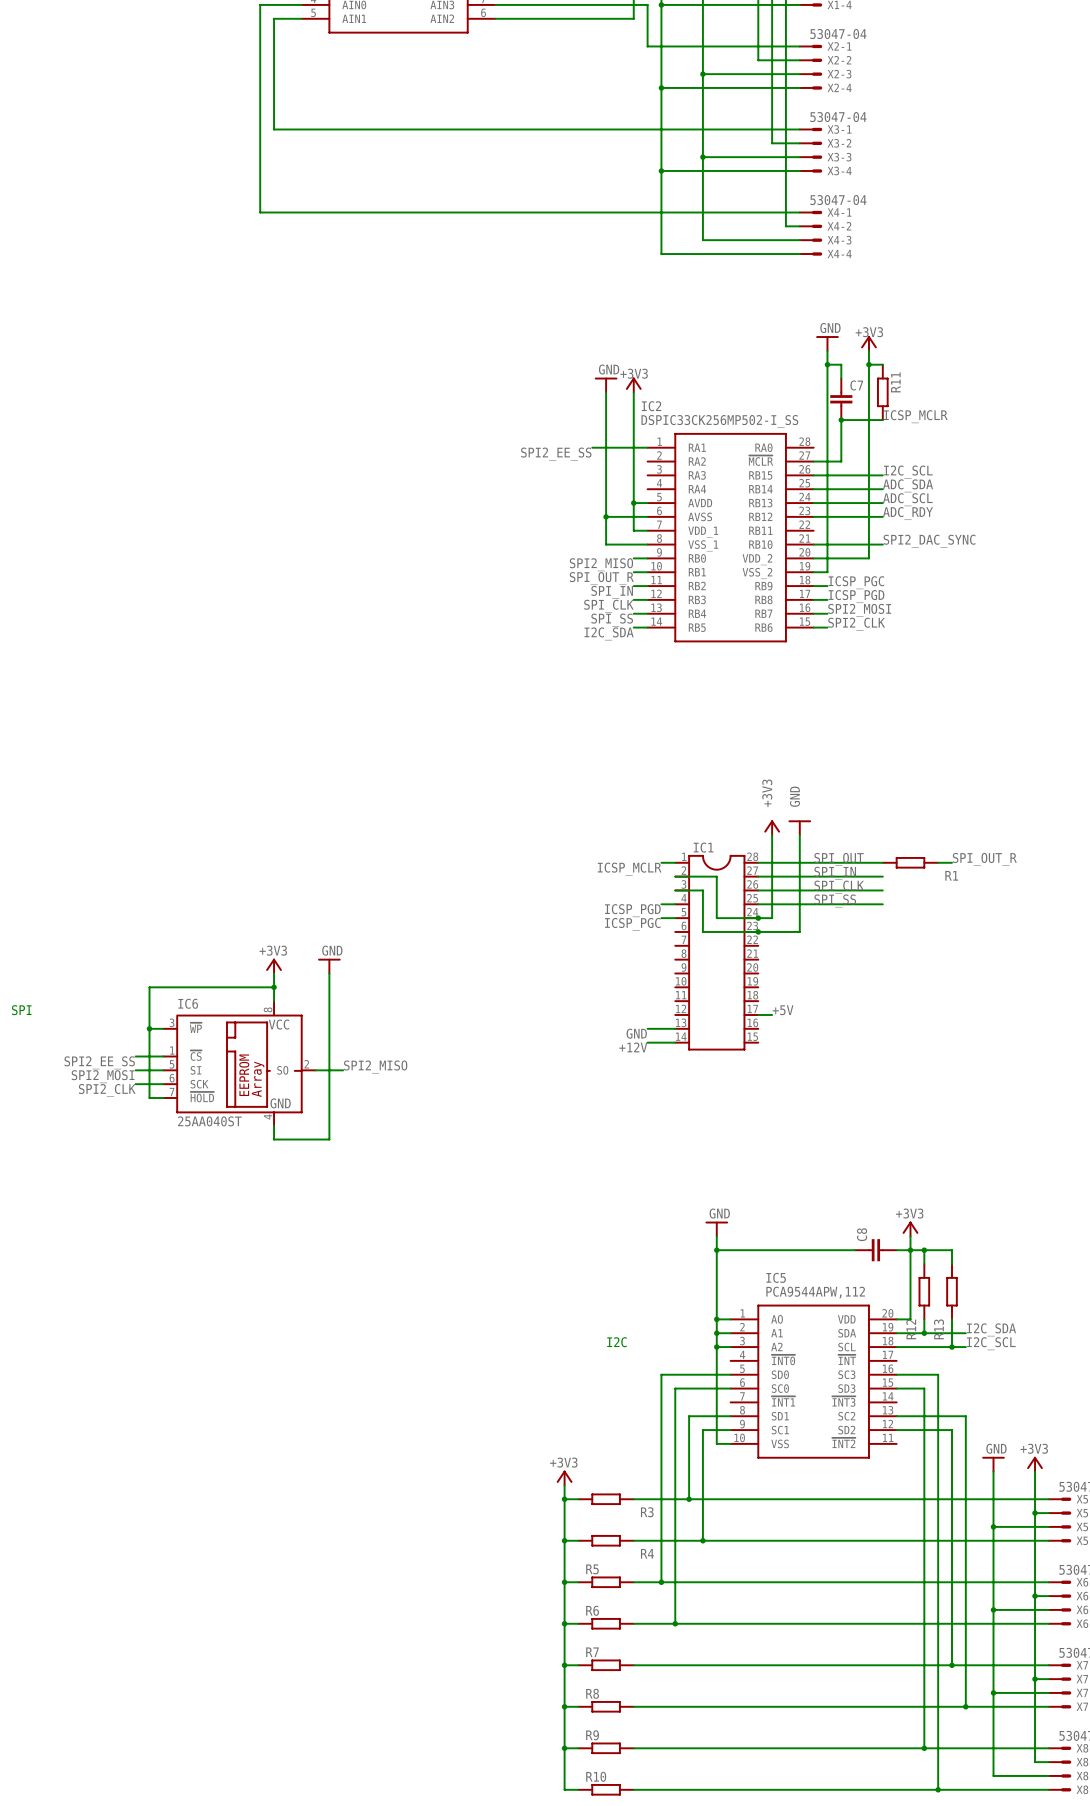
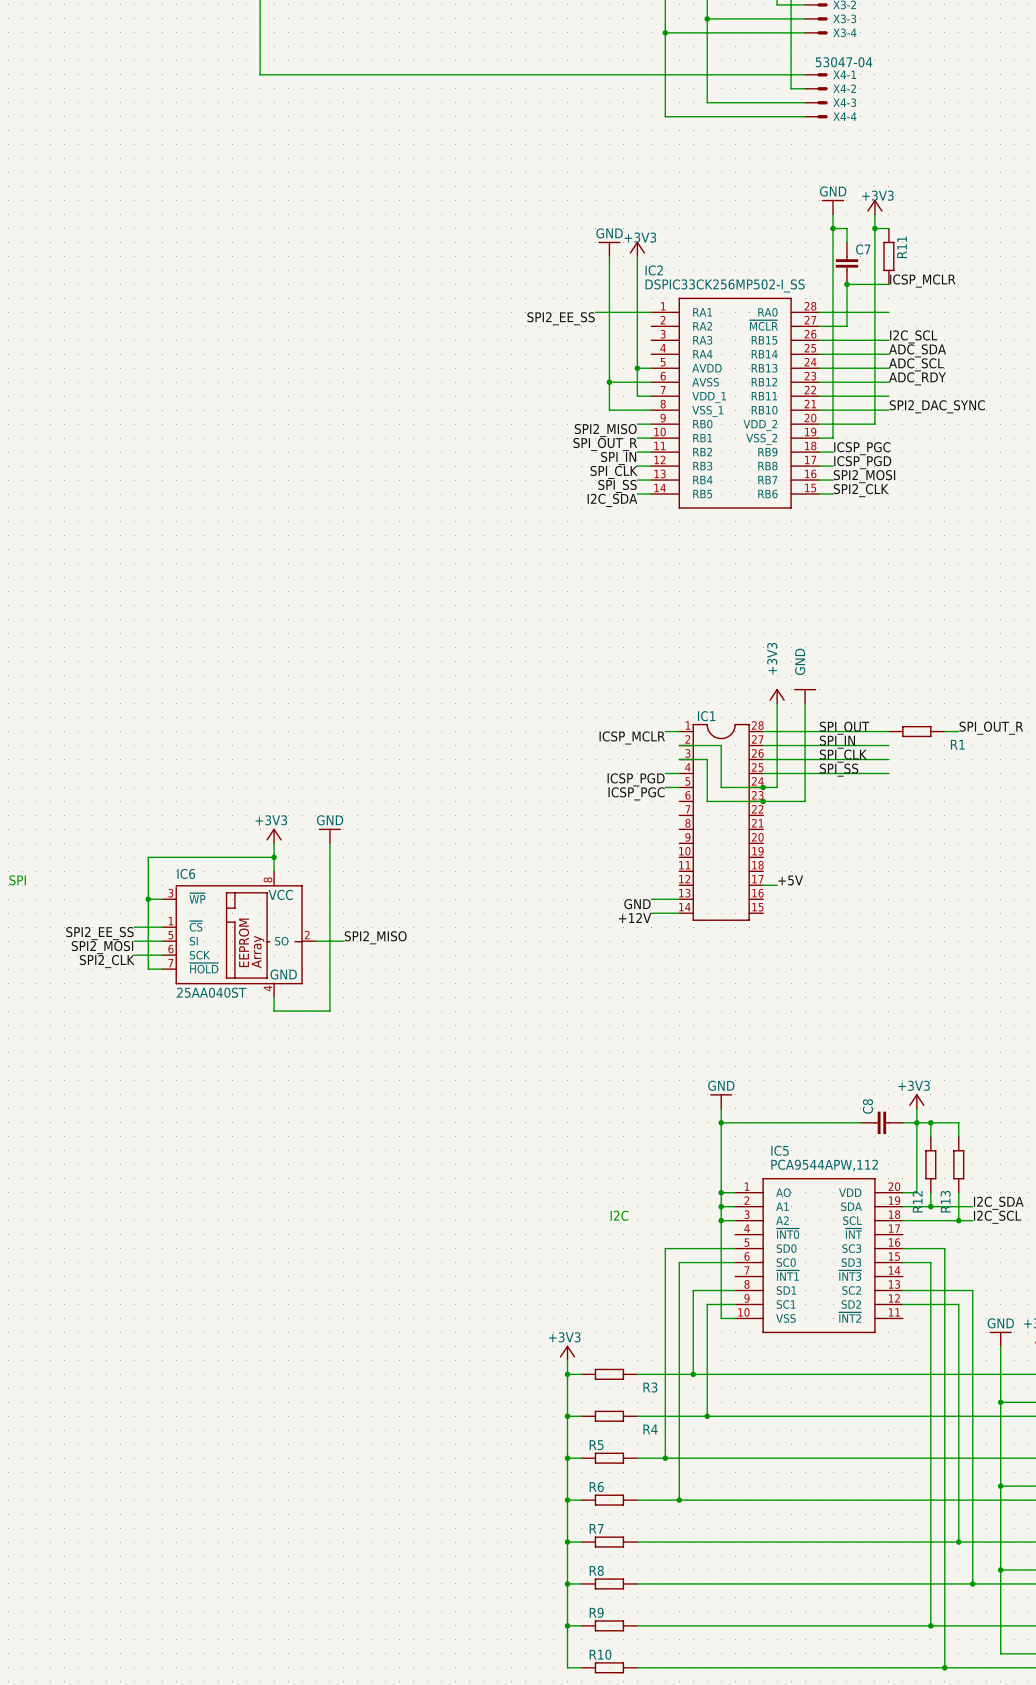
wire: none -> (819, 312) (888, 312)
wire: none -> (819, 396) (888, 396)

